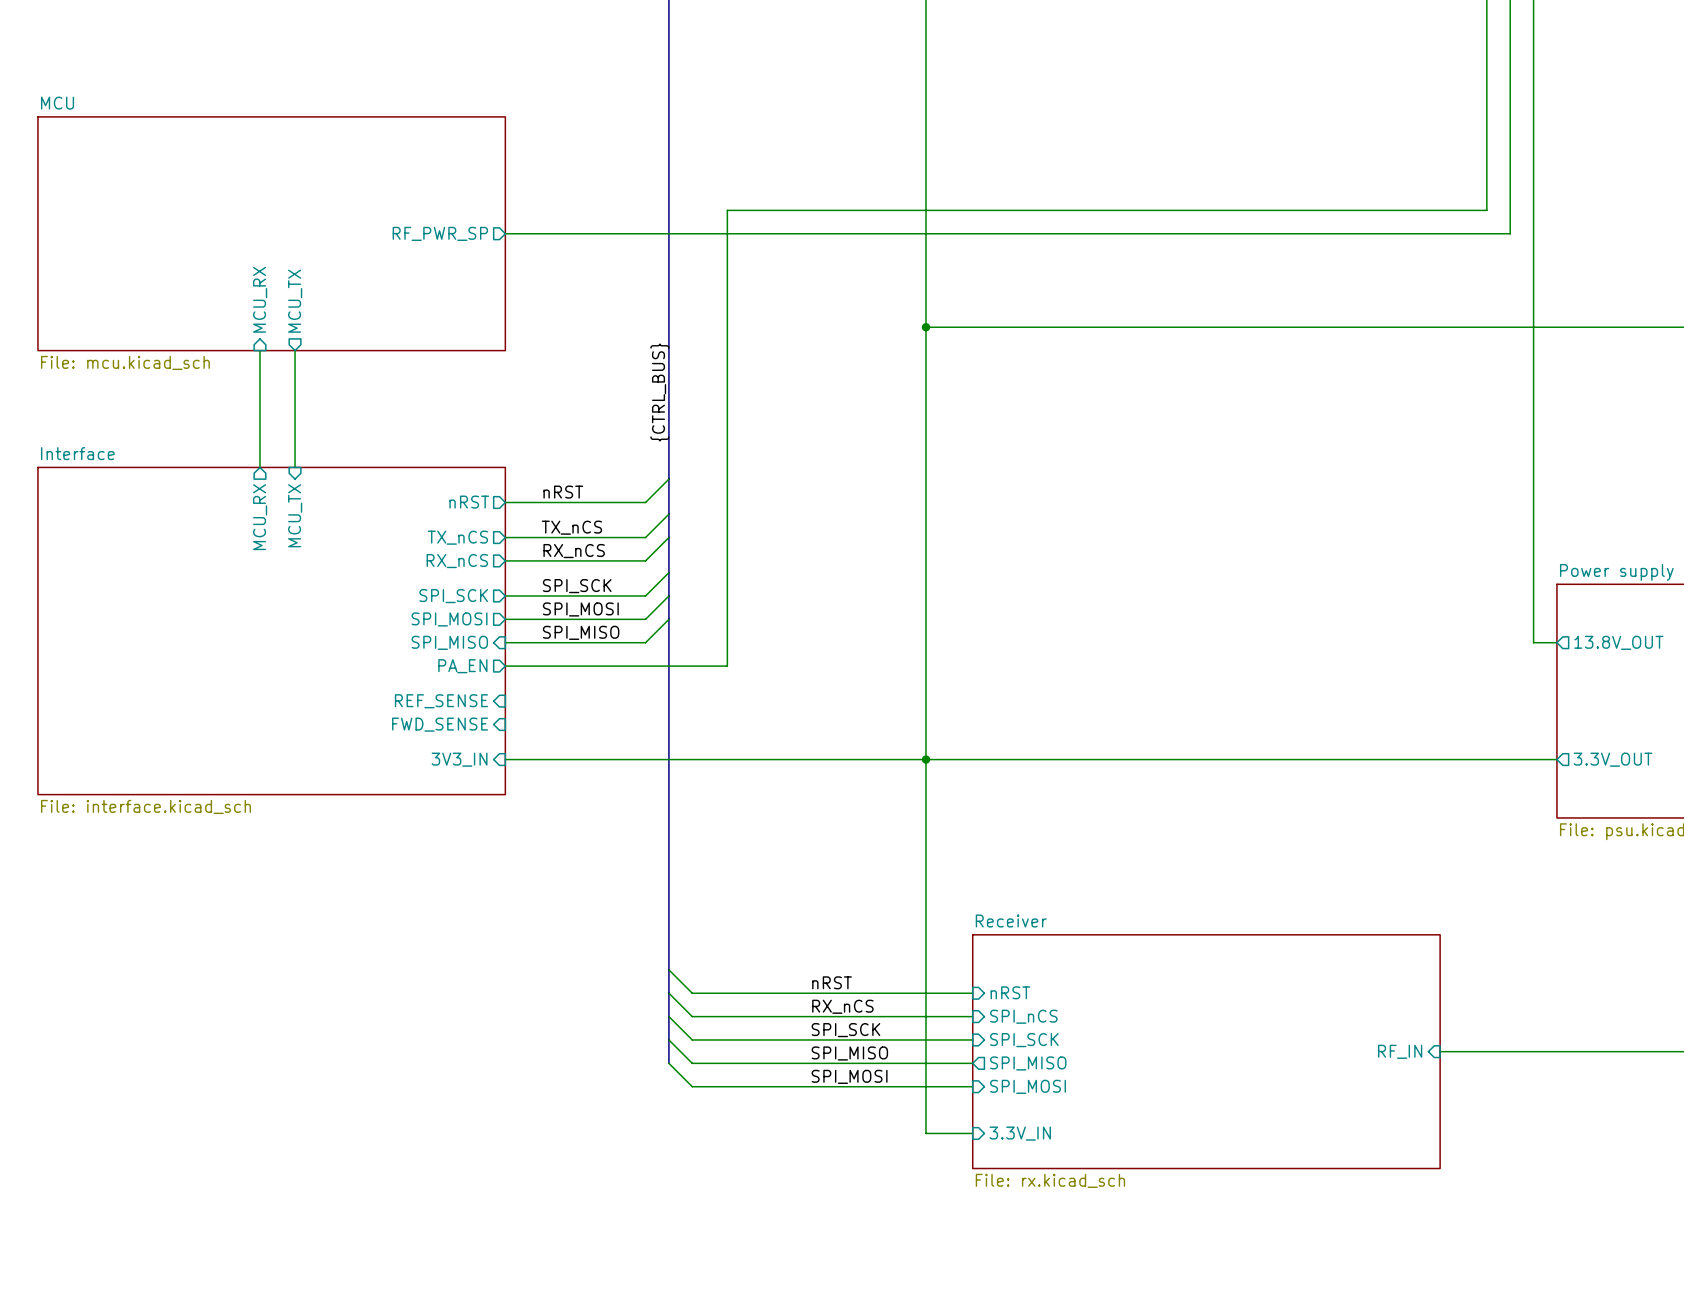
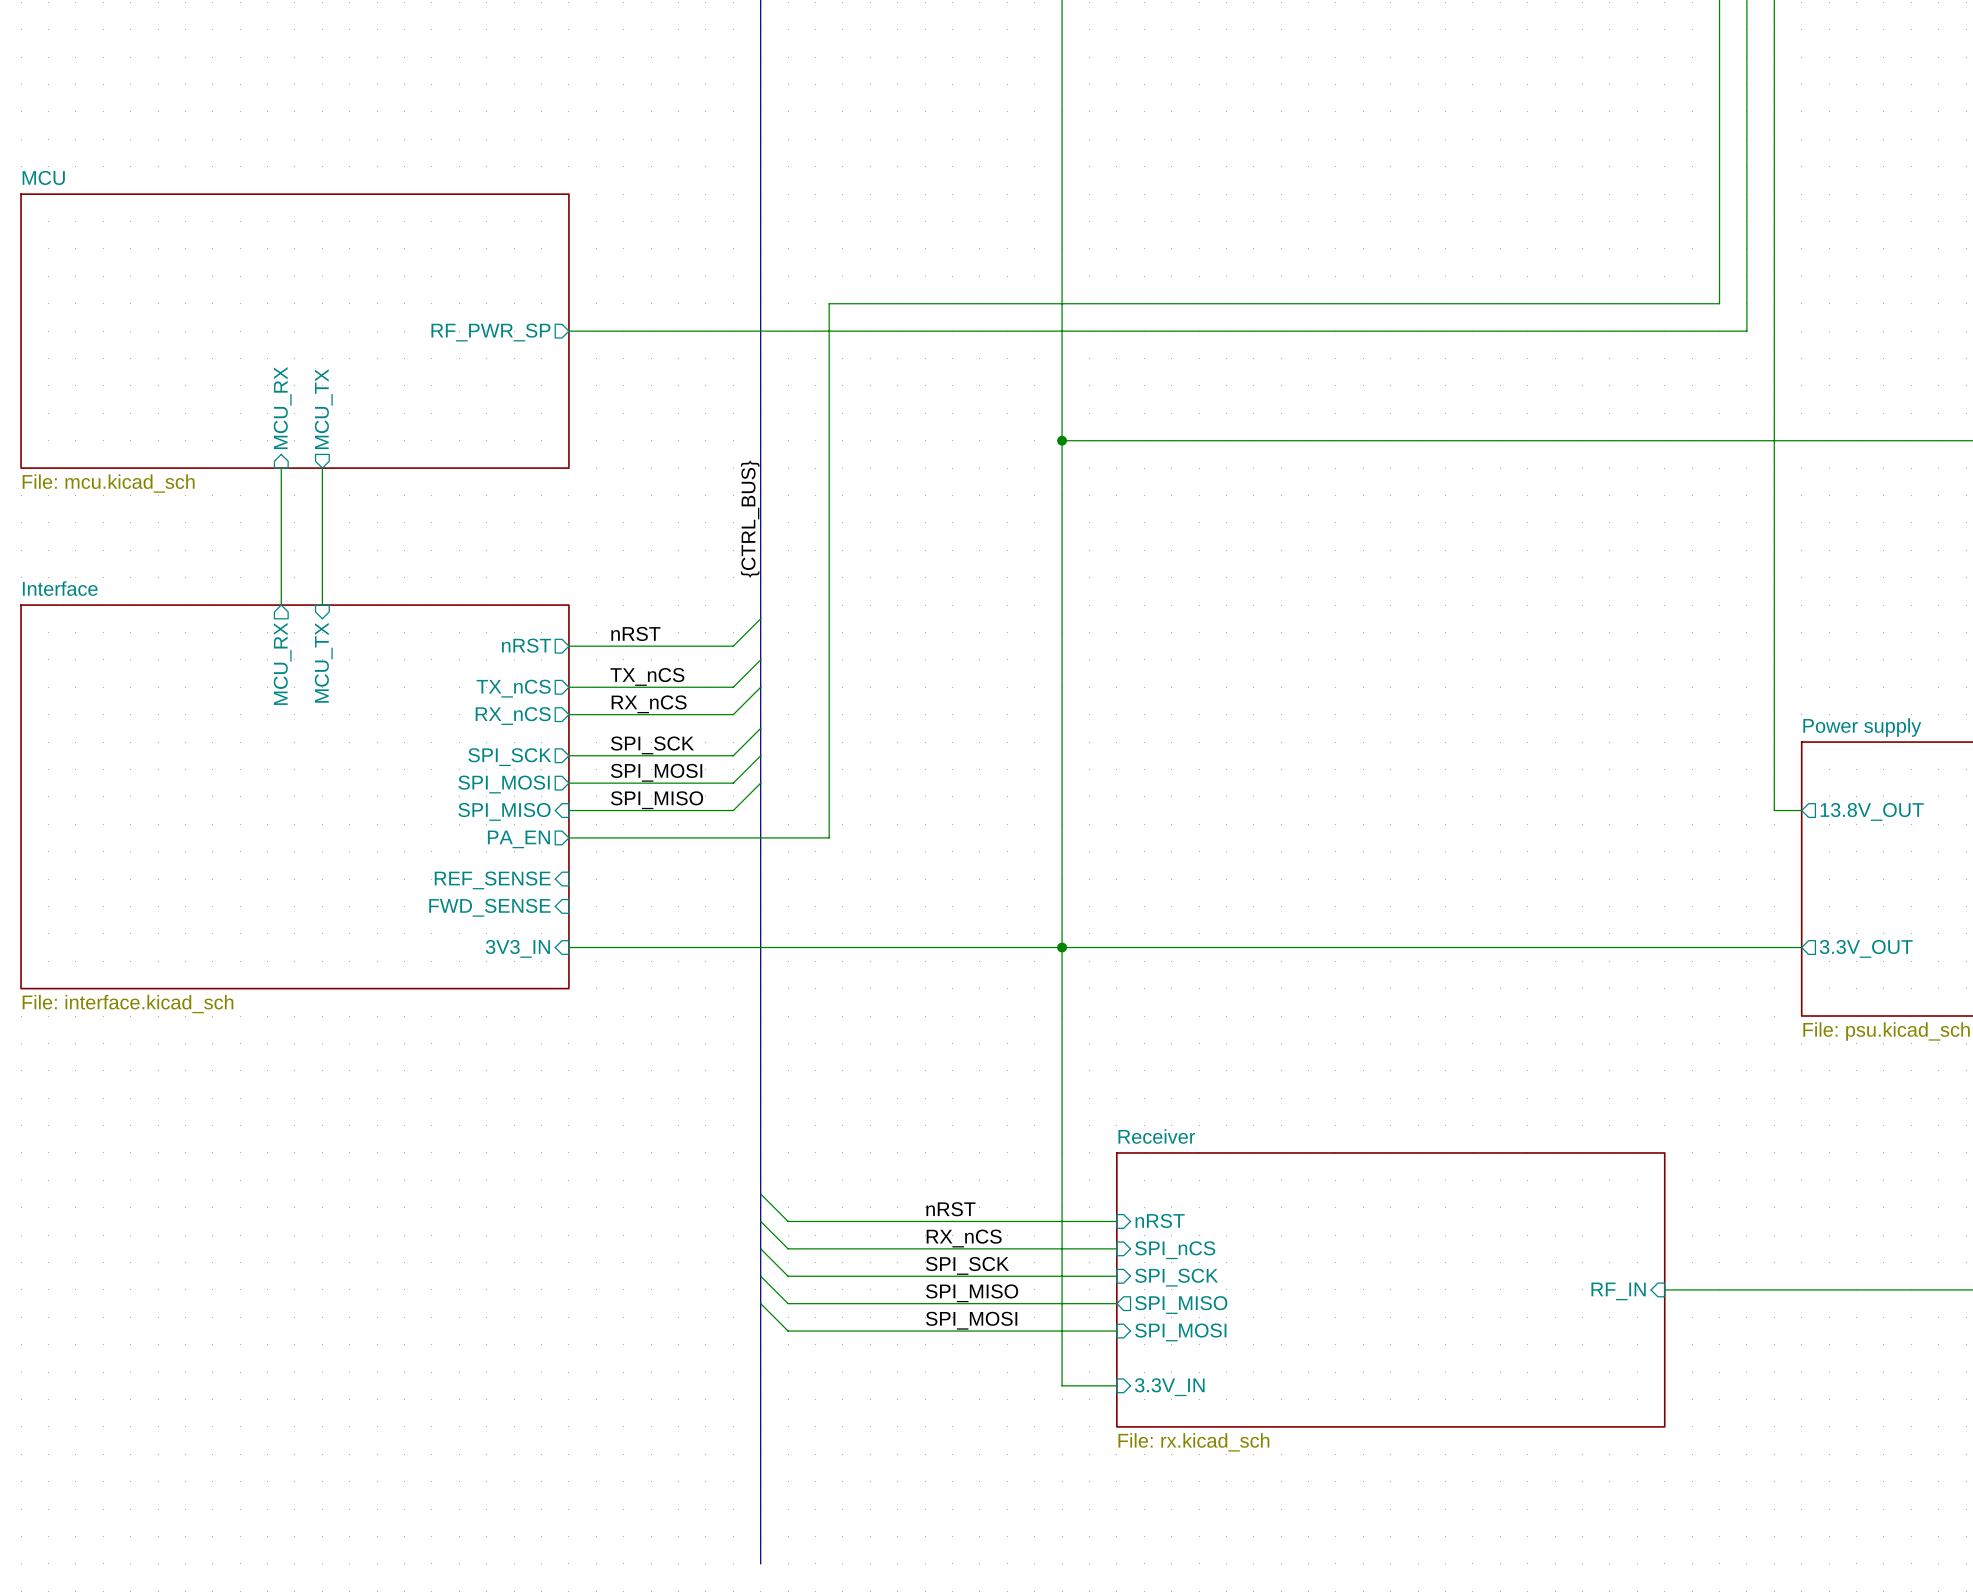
bus: none -> (760, 1303) (760, 1563)

